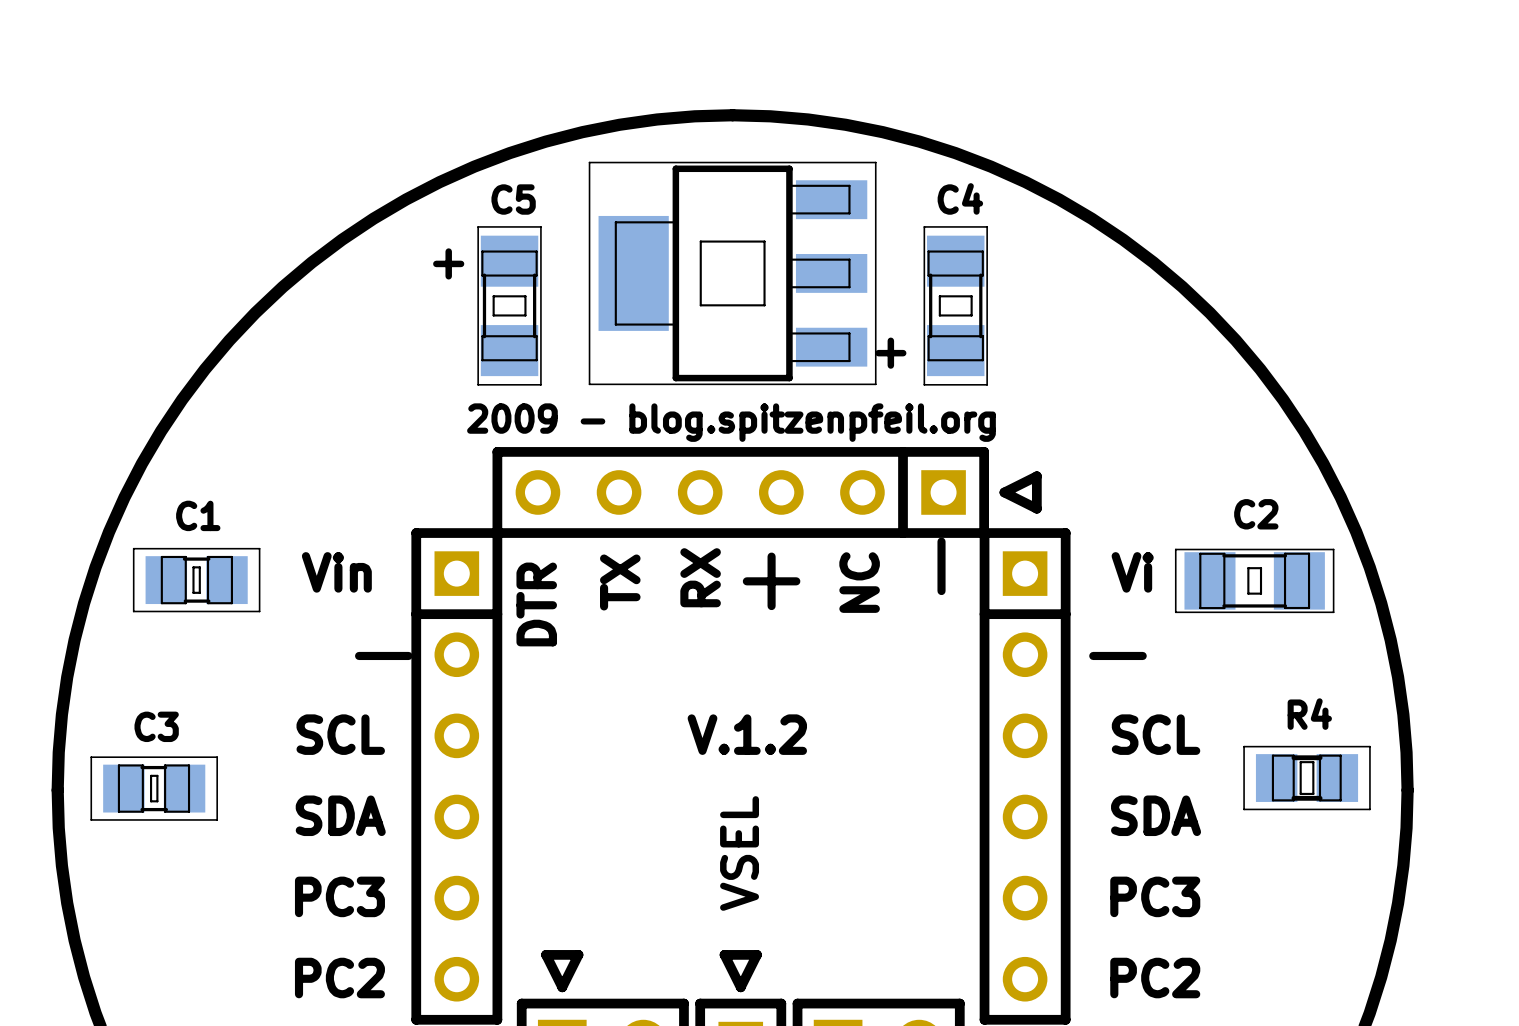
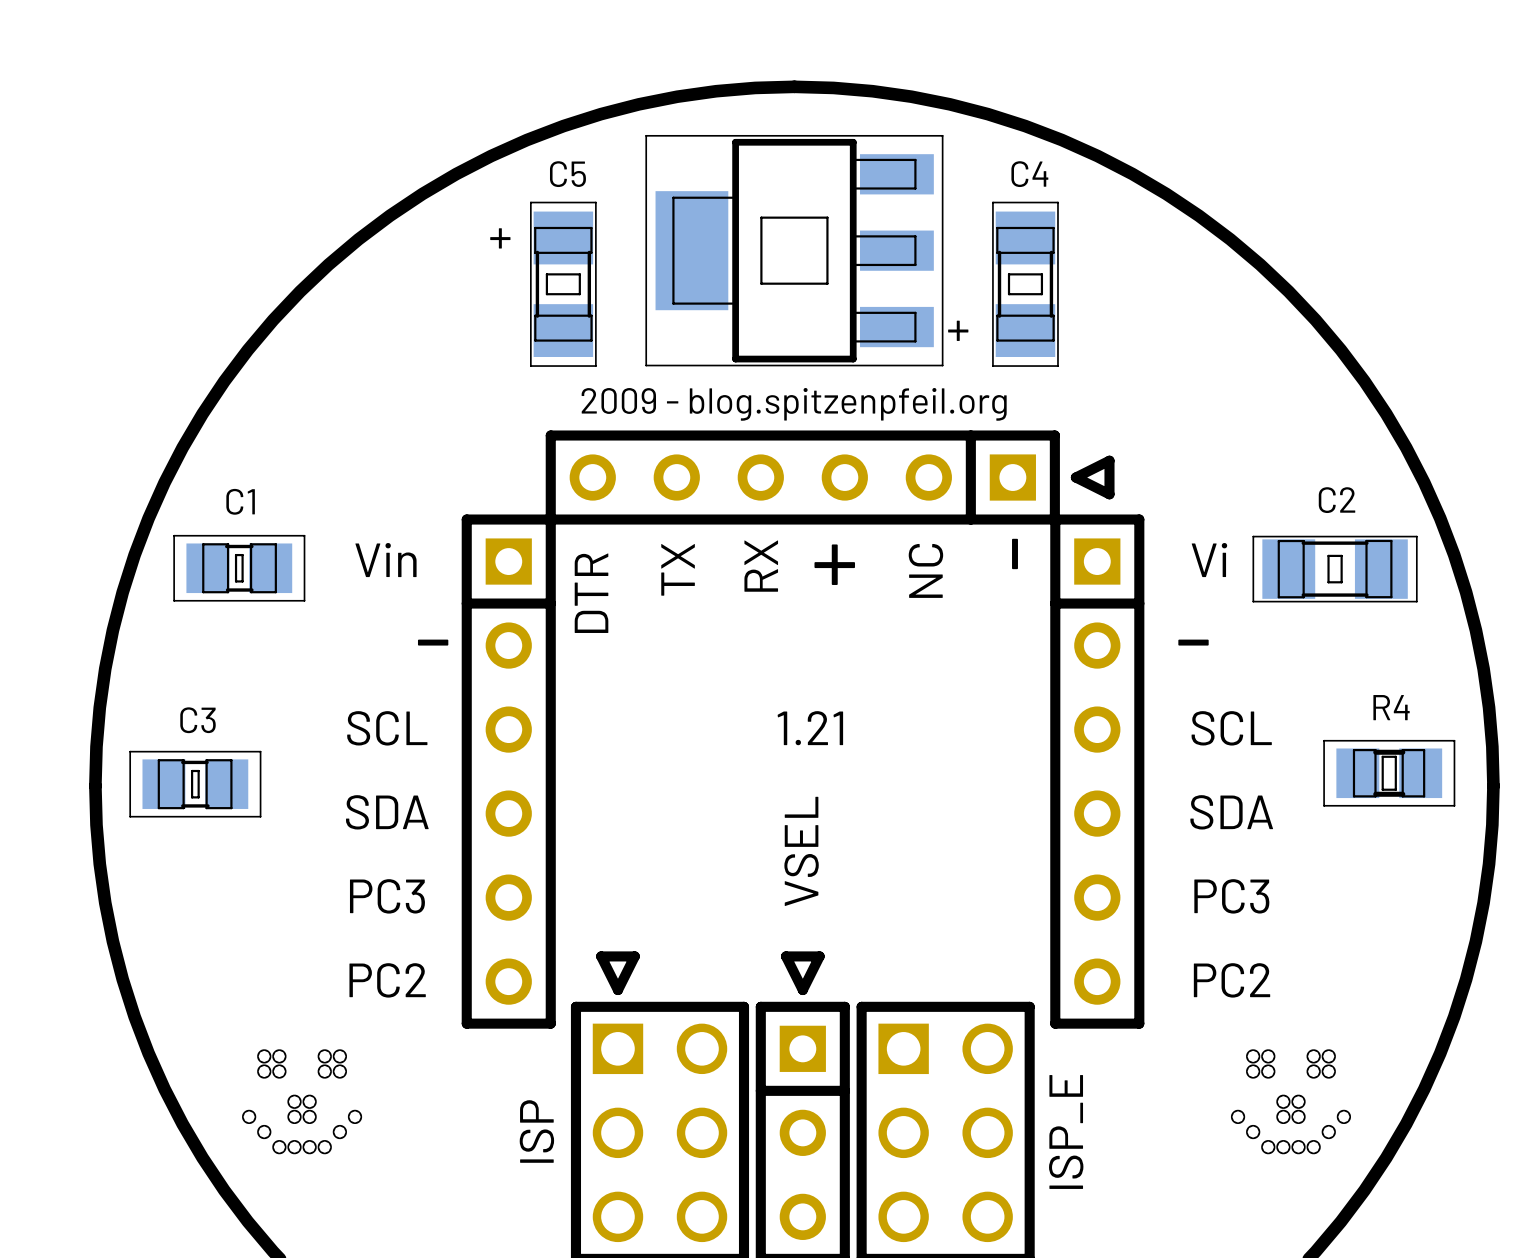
text: V.1.2 (747, 734) -> 1.21 (810, 728)

